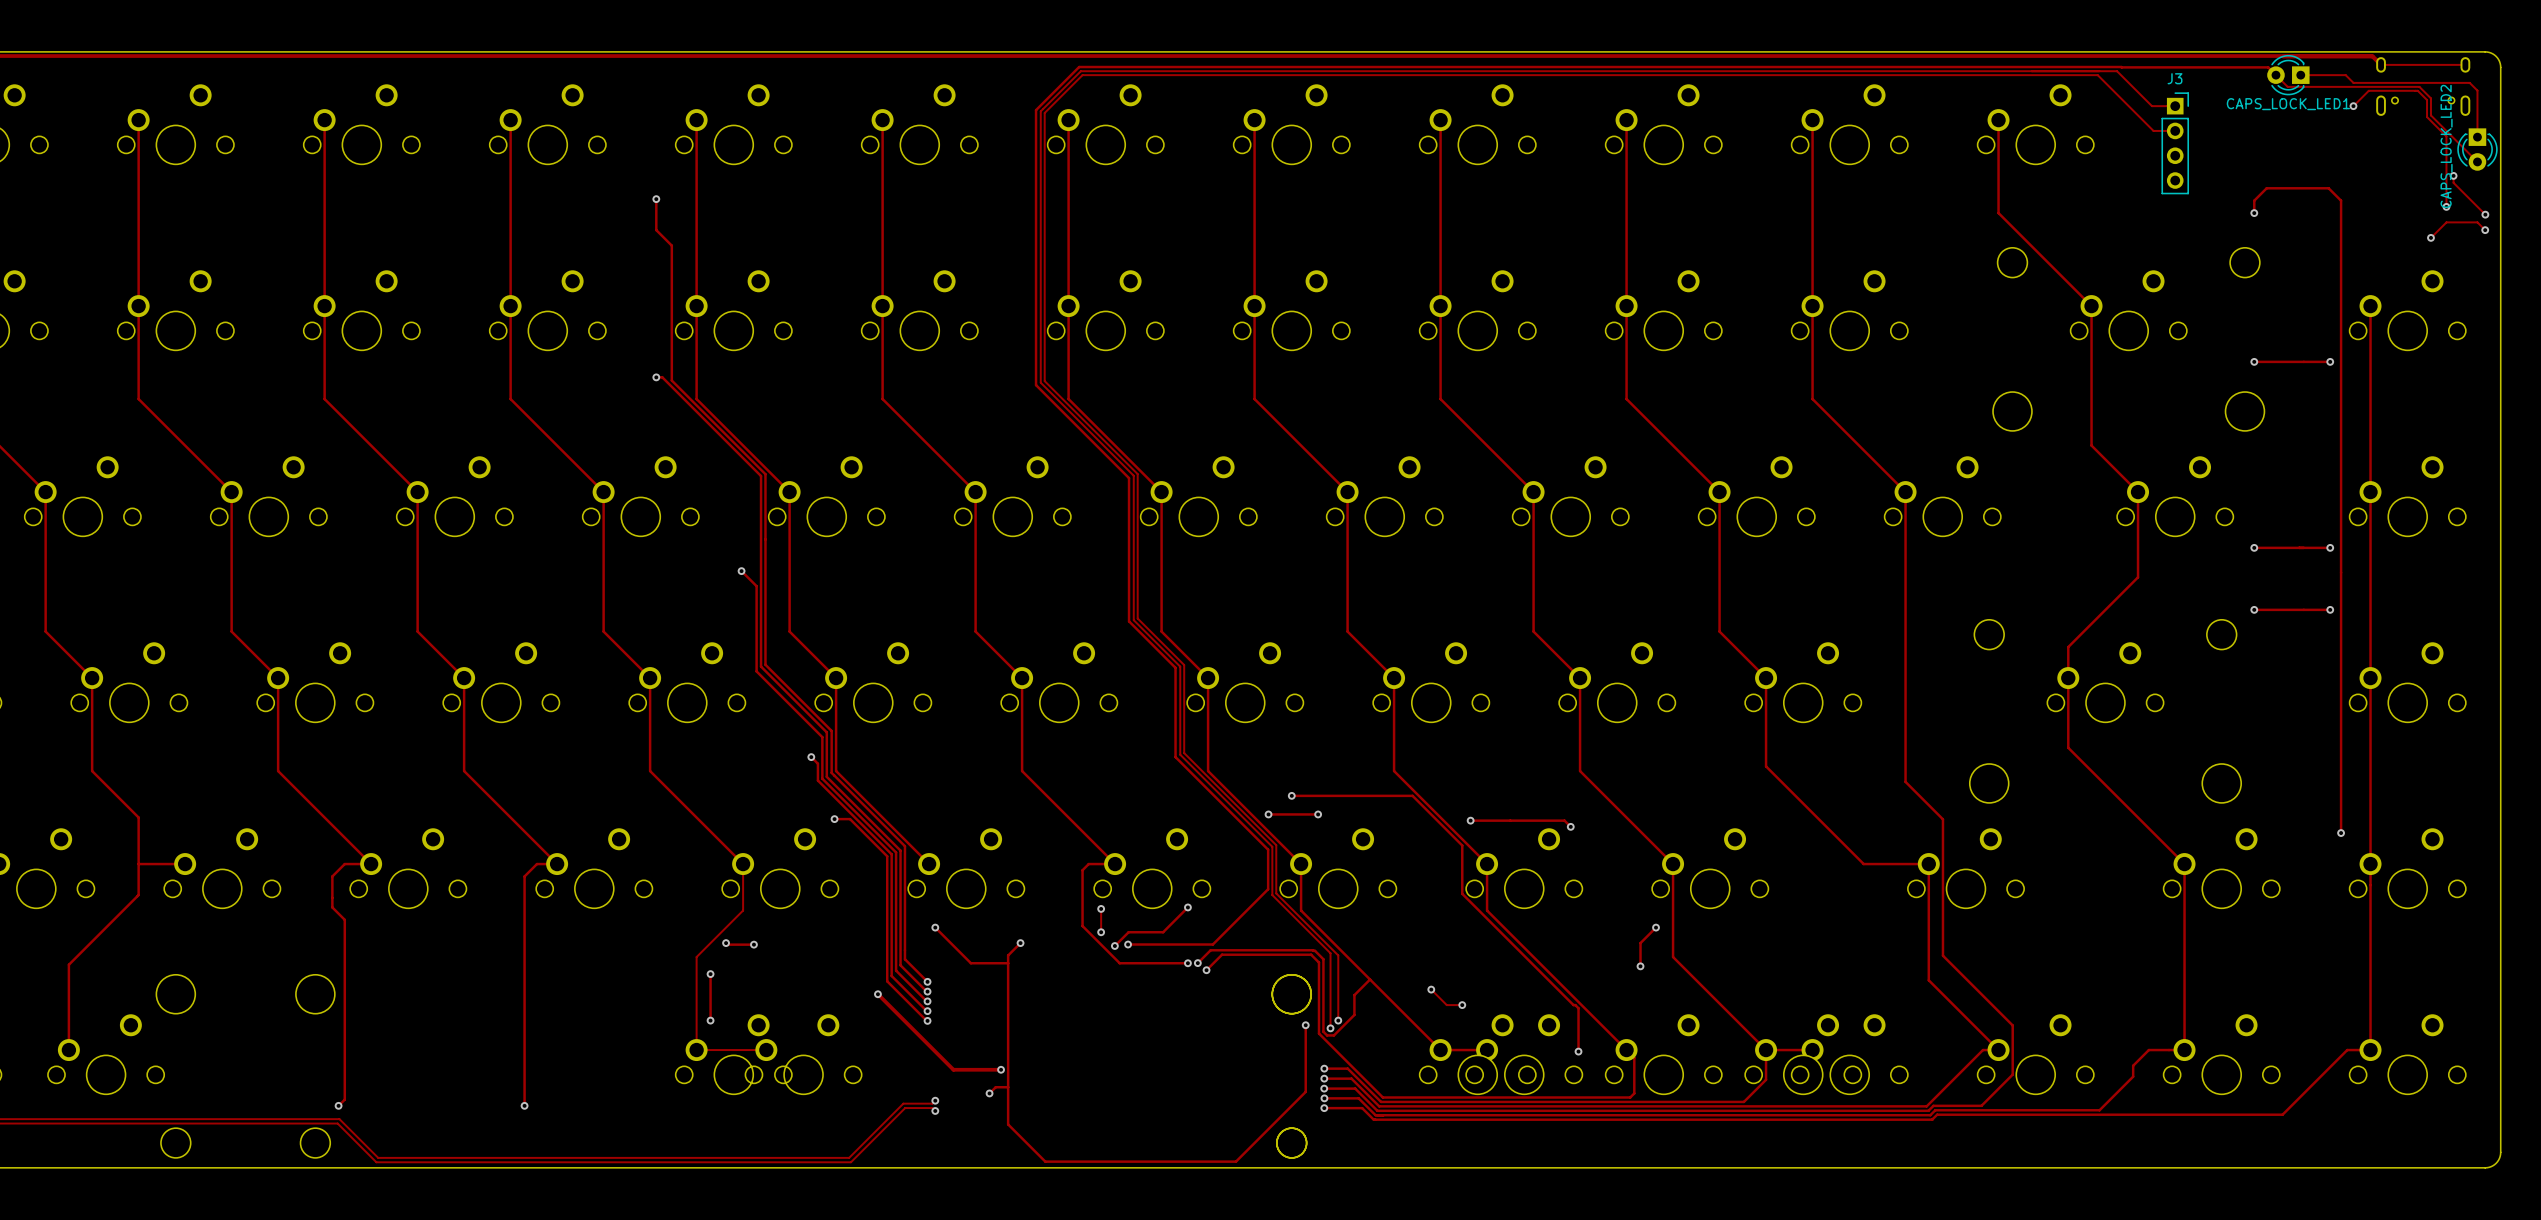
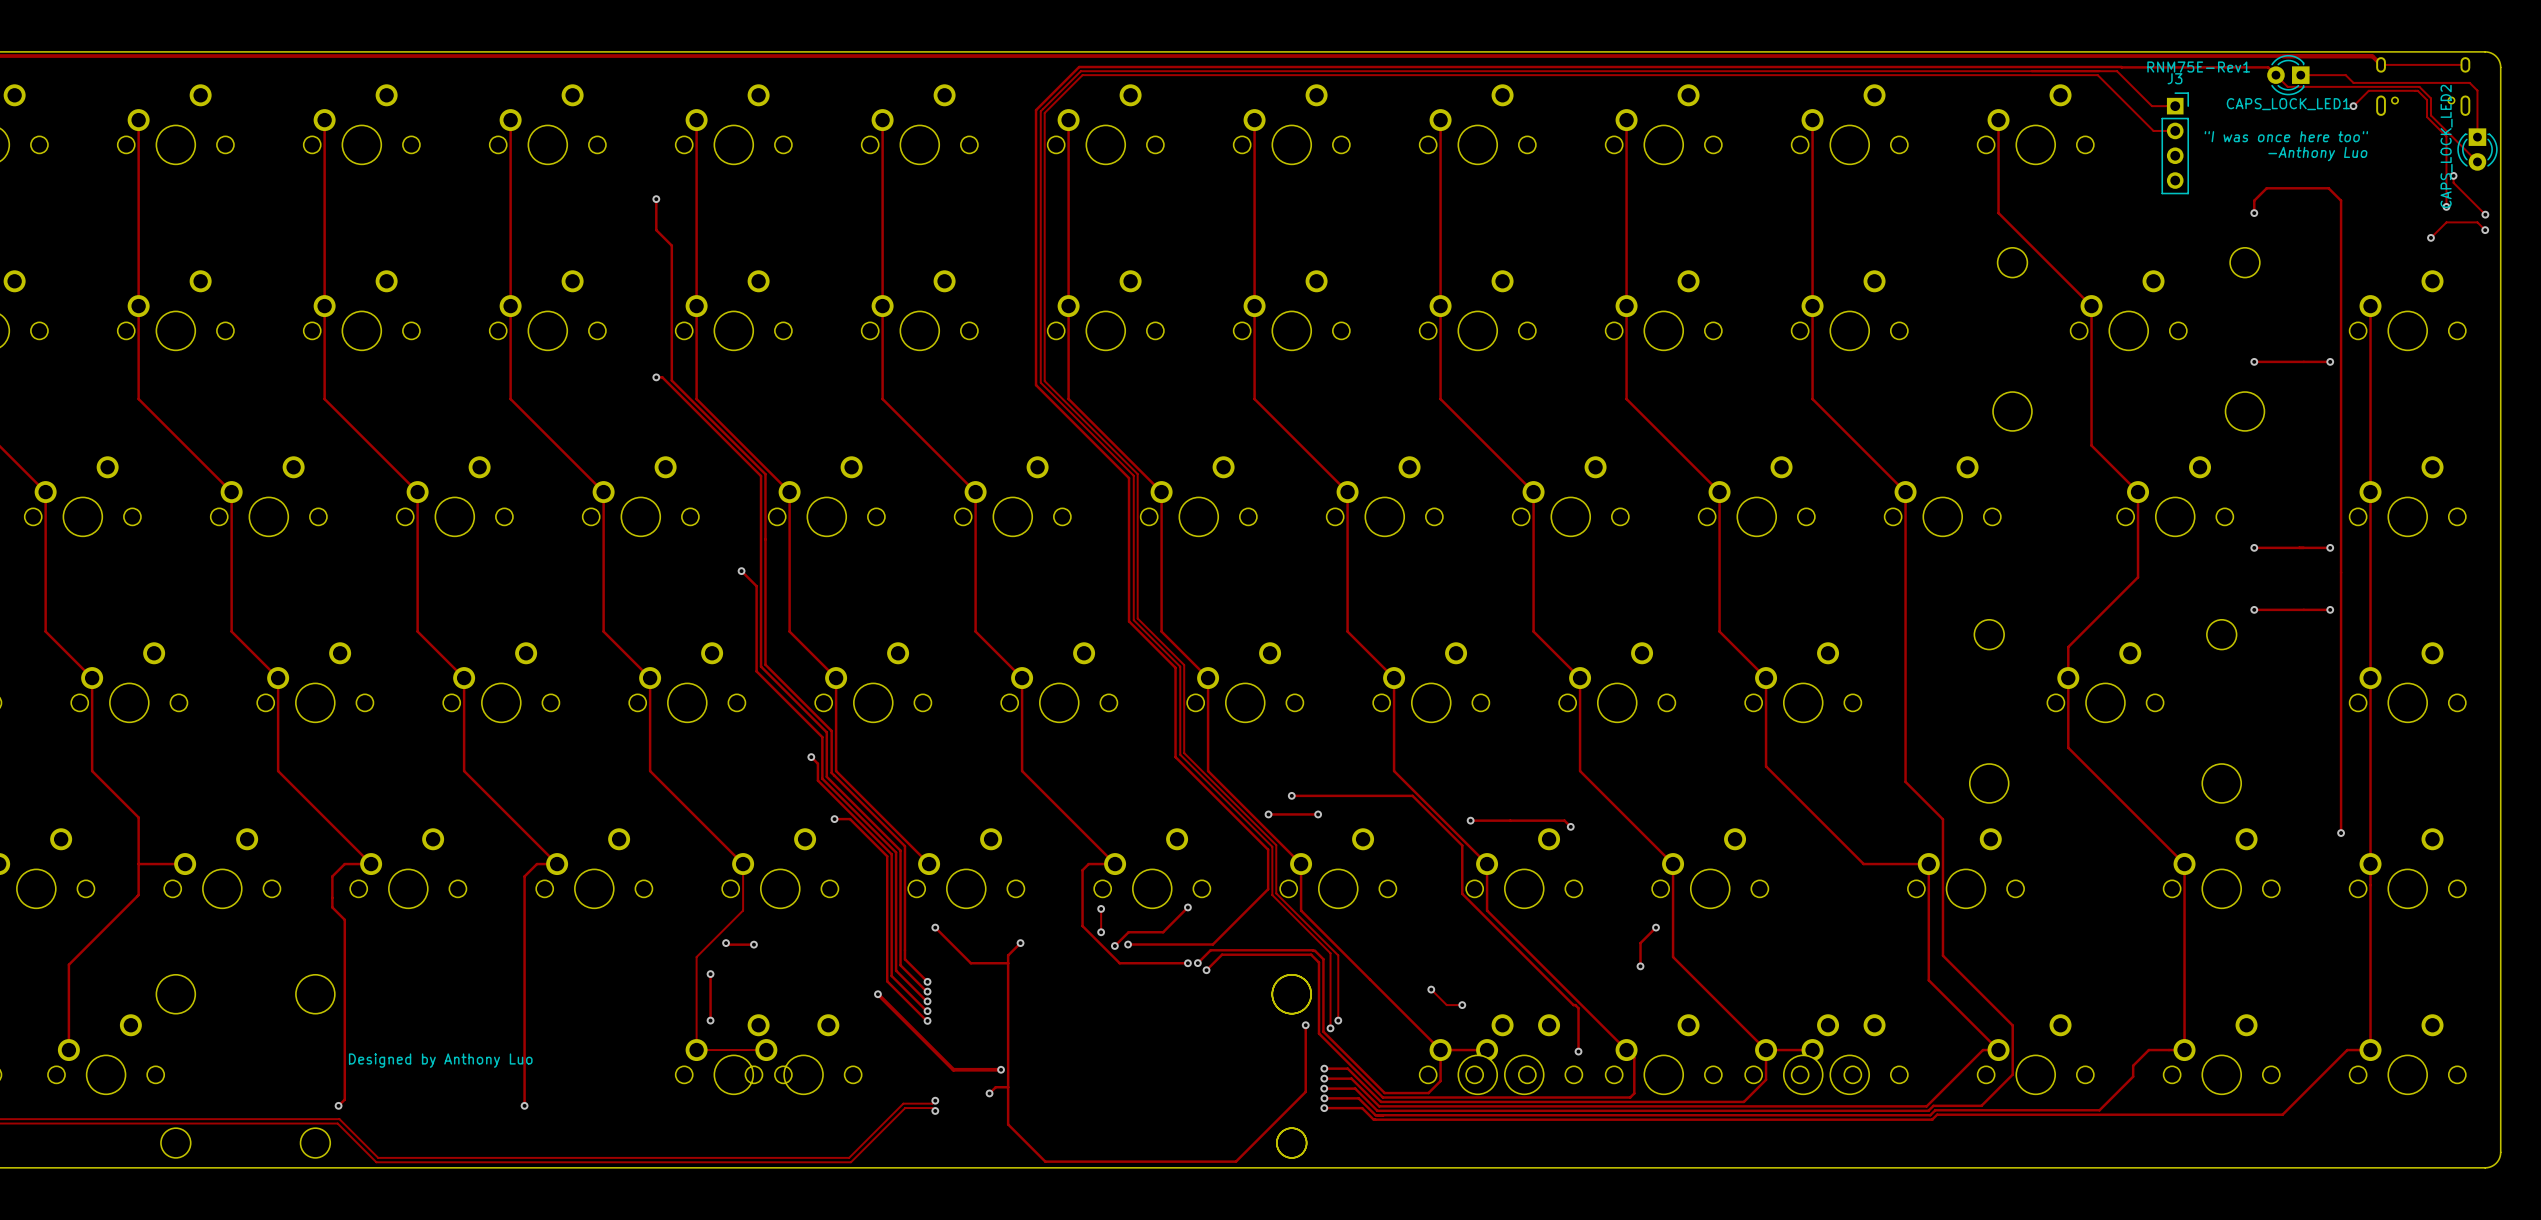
text: none -> RNM75E-Rev1 (2198, 67)
text: none -> "I was once here too" (2286, 136)
text: none -> -Anthony Luo (2317, 154)
track: (1370, 979) (1354, 995) (1354, 1014) (1333, 1035) (1327, 1035) -> (1440, 1050) (1440, 1081) (1428, 1093) (1384, 1093) (1327, 1035)
text: none -> Designed by Anthony Luo (440, 1060)

